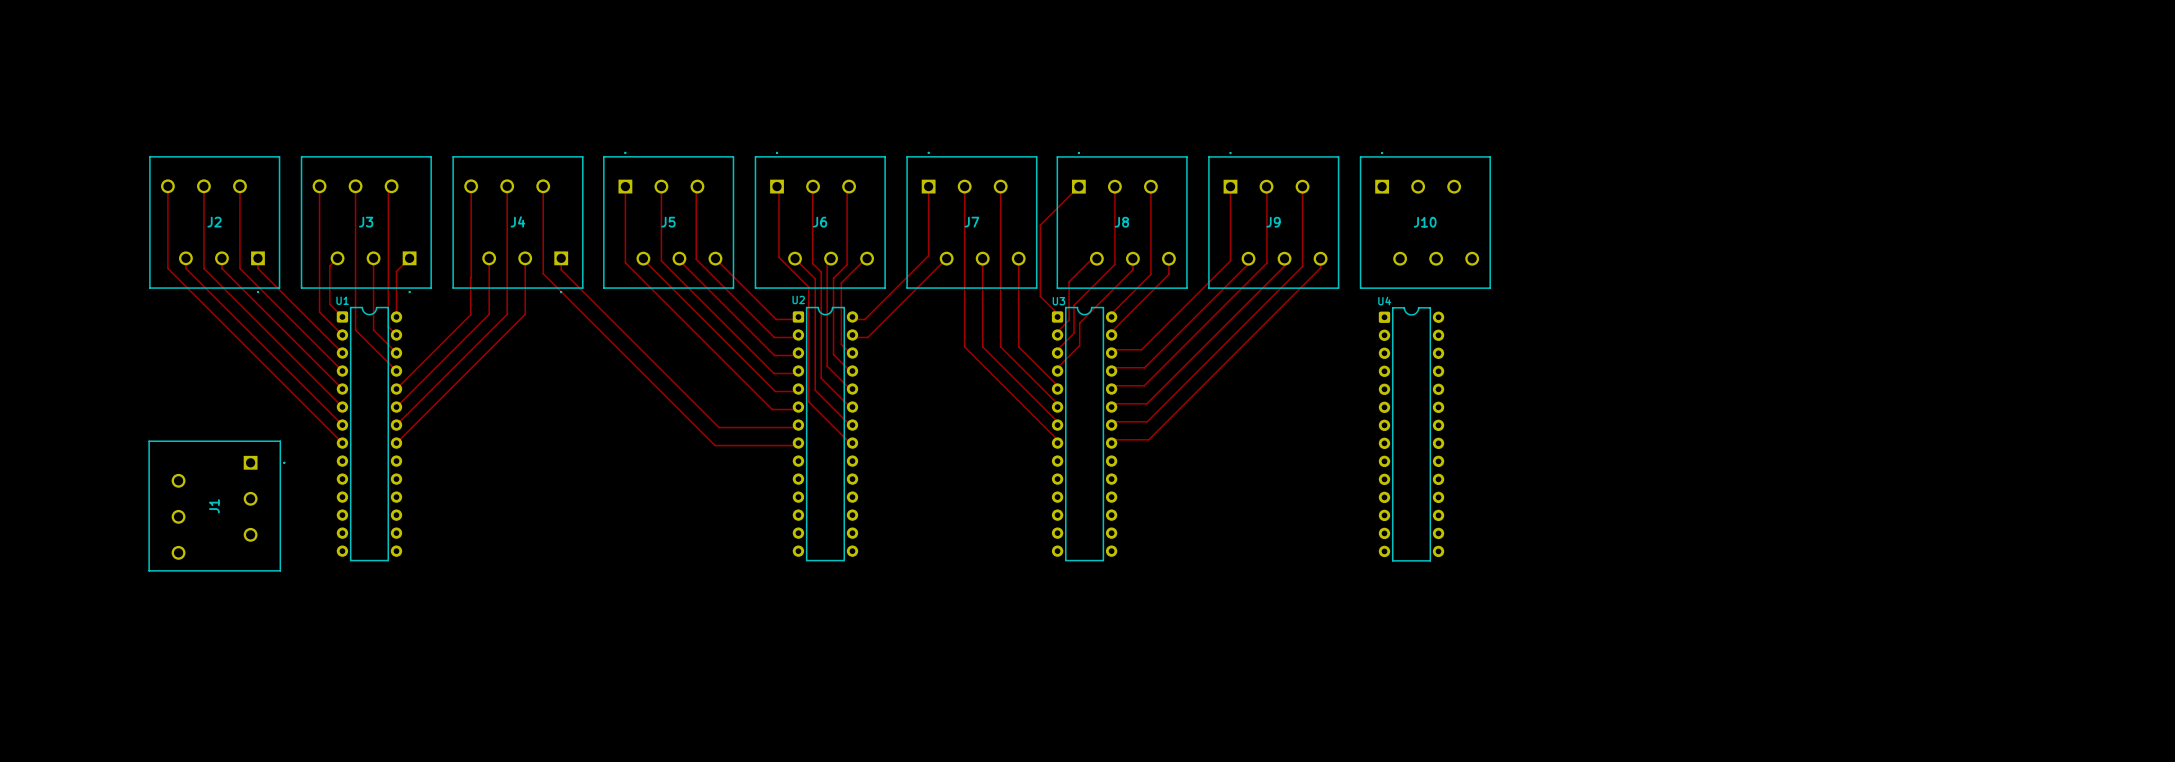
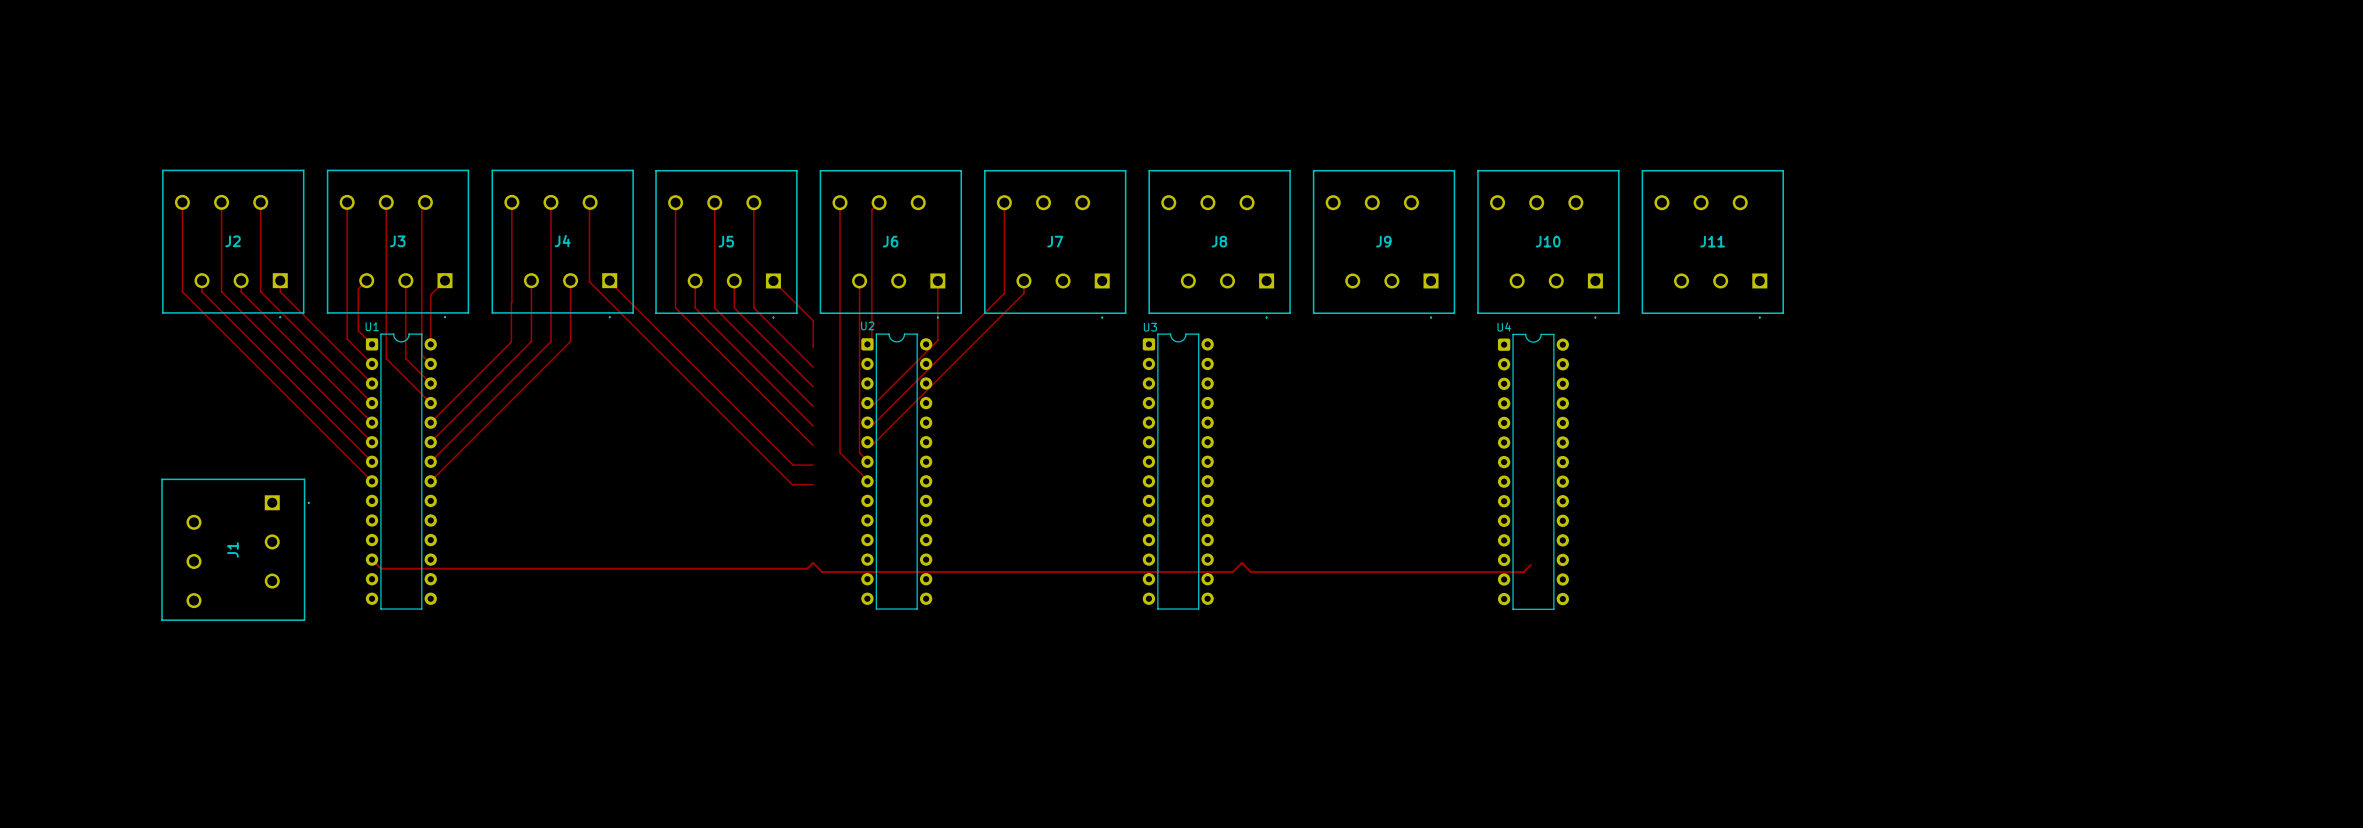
track: none -> (589, 202) (589, 281) (792, 484) (813, 484)
track: (543, 186) (543, 273) (715, 445) (798, 445) -> none
track: none -> (675, 202) (675, 307) (813, 445)
track: (625, 186) (625, 262) (772, 409) (798, 409) -> none
track: none -> (714, 202) (714, 307) (813, 406)
track: (661, 186) (661, 260) (774, 373) (798, 373) -> none
track: none -> (753, 202) (753, 307) (813, 367)
track: (697, 186) (696, 259) (774, 337) (798, 337) -> none
track: none -> (839, 202) (839, 452) (871, 484)
track: (777, 186) (779, 188) (779, 257) (808, 287) (808, 401) (852, 445) -> none
track: none -> (879, 202) (871, 209) (871, 347)
track: (813, 186) (812, 263) (821, 272) (821, 378) (852, 409) -> none
track: (849, 186) (847, 188) (847, 264) (833, 278) (833, 354) (852, 373) -> none
track: none -> (1004, 202) (1004, 293) (871, 425)
track: (928, 186) (928, 255) (864, 319) (852, 319) -> none
track: (964, 186) (964, 346) (1057, 439) -> none
track: (1000, 186) (1000, 346) (1057, 403) -> none
track: (1078, 186) (1040, 225) (1040, 296) (1057, 313) -> none
track: (1114, 186) (1114, 264) (1074, 305) (1074, 333) (1057, 349) -> none
track: (1150, 186) (1150, 274) (1111, 313) -> none
track: (1230, 186) (1230, 260) (1141, 349) (1111, 349) -> none
track: (1266, 186) (1266, 263) (1144, 385) (1111, 385) -> none
track: (1302, 186) (1302, 266) (1147, 421) (1111, 421) -> none
J5 rotation: 0° (668, 220) -> 180° (726, 244)
J6 rotation: 0° (820, 220) -> 180° (890, 244)
J7 rotation: 0° (971, 220) -> 180° (1055, 244)
J8 rotation: 0° (1122, 220) -> 180° (1219, 244)
J9 rotation: 0° (1273, 220) -> 180° (1384, 244)
J10 rotation: 0° (1425, 220) -> 180° (1548, 244)
J11: none -> (1712, 244)
track: none -> (609, 280) (793, 465) (813, 465)
track: (561, 258) (561, 269) (719, 427) (798, 427) -> none
track: none -> (695, 280) (695, 307) (813, 425)
track: (643, 258) (775, 391) (798, 391) -> none
track: none -> (734, 280) (734, 307) (813, 386)
track: (679, 258) (774, 355) (798, 355) -> none
track: none -> (773, 280) (813, 320) (813, 347)
track: (715, 258) (776, 319) (798, 319) -> none
track: none -> (859, 280) (859, 452) (871, 465)
track: (795, 258) (815, 278) (815, 390) (852, 427) -> none
track: (831, 258) (827, 262) (827, 366) (852, 391) -> none
track: none -> (937, 280) (937, 340) (871, 406)
track: (867, 258) (841, 283) (841, 344) (852, 355) -> none
track: none -> (1023, 280) (1023, 293) (871, 445)
track: (946, 258) (867, 337) (852, 337) -> none
track: (982, 258) (982, 346) (1057, 421) -> none
track: (1018, 258) (1018, 346) (1057, 385) -> none
track: (1096, 258) (1092, 258) (1069, 281) (1069, 320) (1057, 331) -> none
track: (1132, 258) (1132, 269) (1079, 323) (1079, 345) (1057, 367) -> none
track: (1168, 258) (1168, 274) (1111, 331) -> none
track: (1248, 258) (1248, 263) (1144, 367) (1111, 367) -> none
track: (1284, 258) (1284, 266) (1146, 403) (1111, 403) -> none
track: (1320, 258) (1320, 268) (1148, 439) (1111, 439) -> none
track: none -> (372, 559) (381, 568) (807, 568) (813, 562) (822, 572) (1232, 572) (1241, 563) (1251, 572) (1523, 572) (1530, 565)

